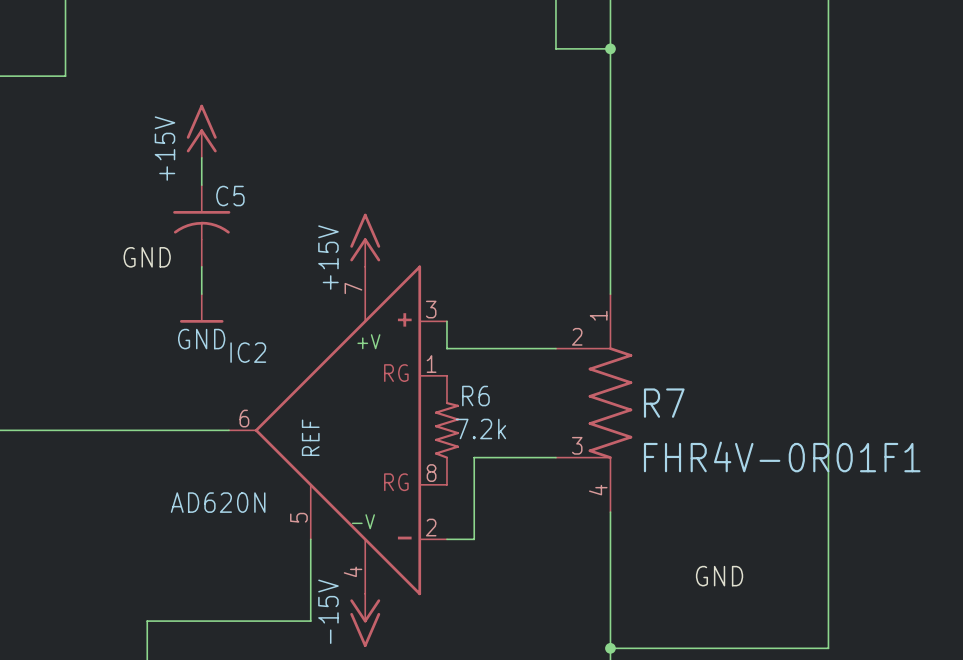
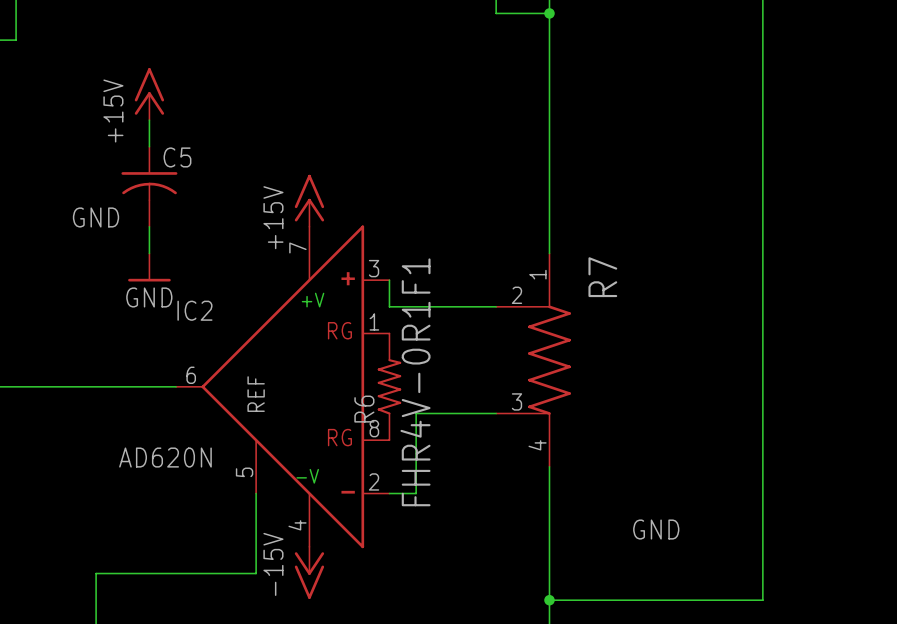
R6 name rotation: 0° (475, 396) -> 90° counterclockwise (364, 409)
R6 name position: R6 (475, 396) -> R6 (364, 409)
R7 name rotation: 0° (664, 403) -> 90° counterclockwise (602, 277)
R7 name position: R7 (664, 403) -> R7 (602, 277)
R6 value: 7.2k (480, 428) -> none
R7 value: FHR4V-0R01F1 (782, 456) -> FHR4V-0R1F1 (415, 382)

